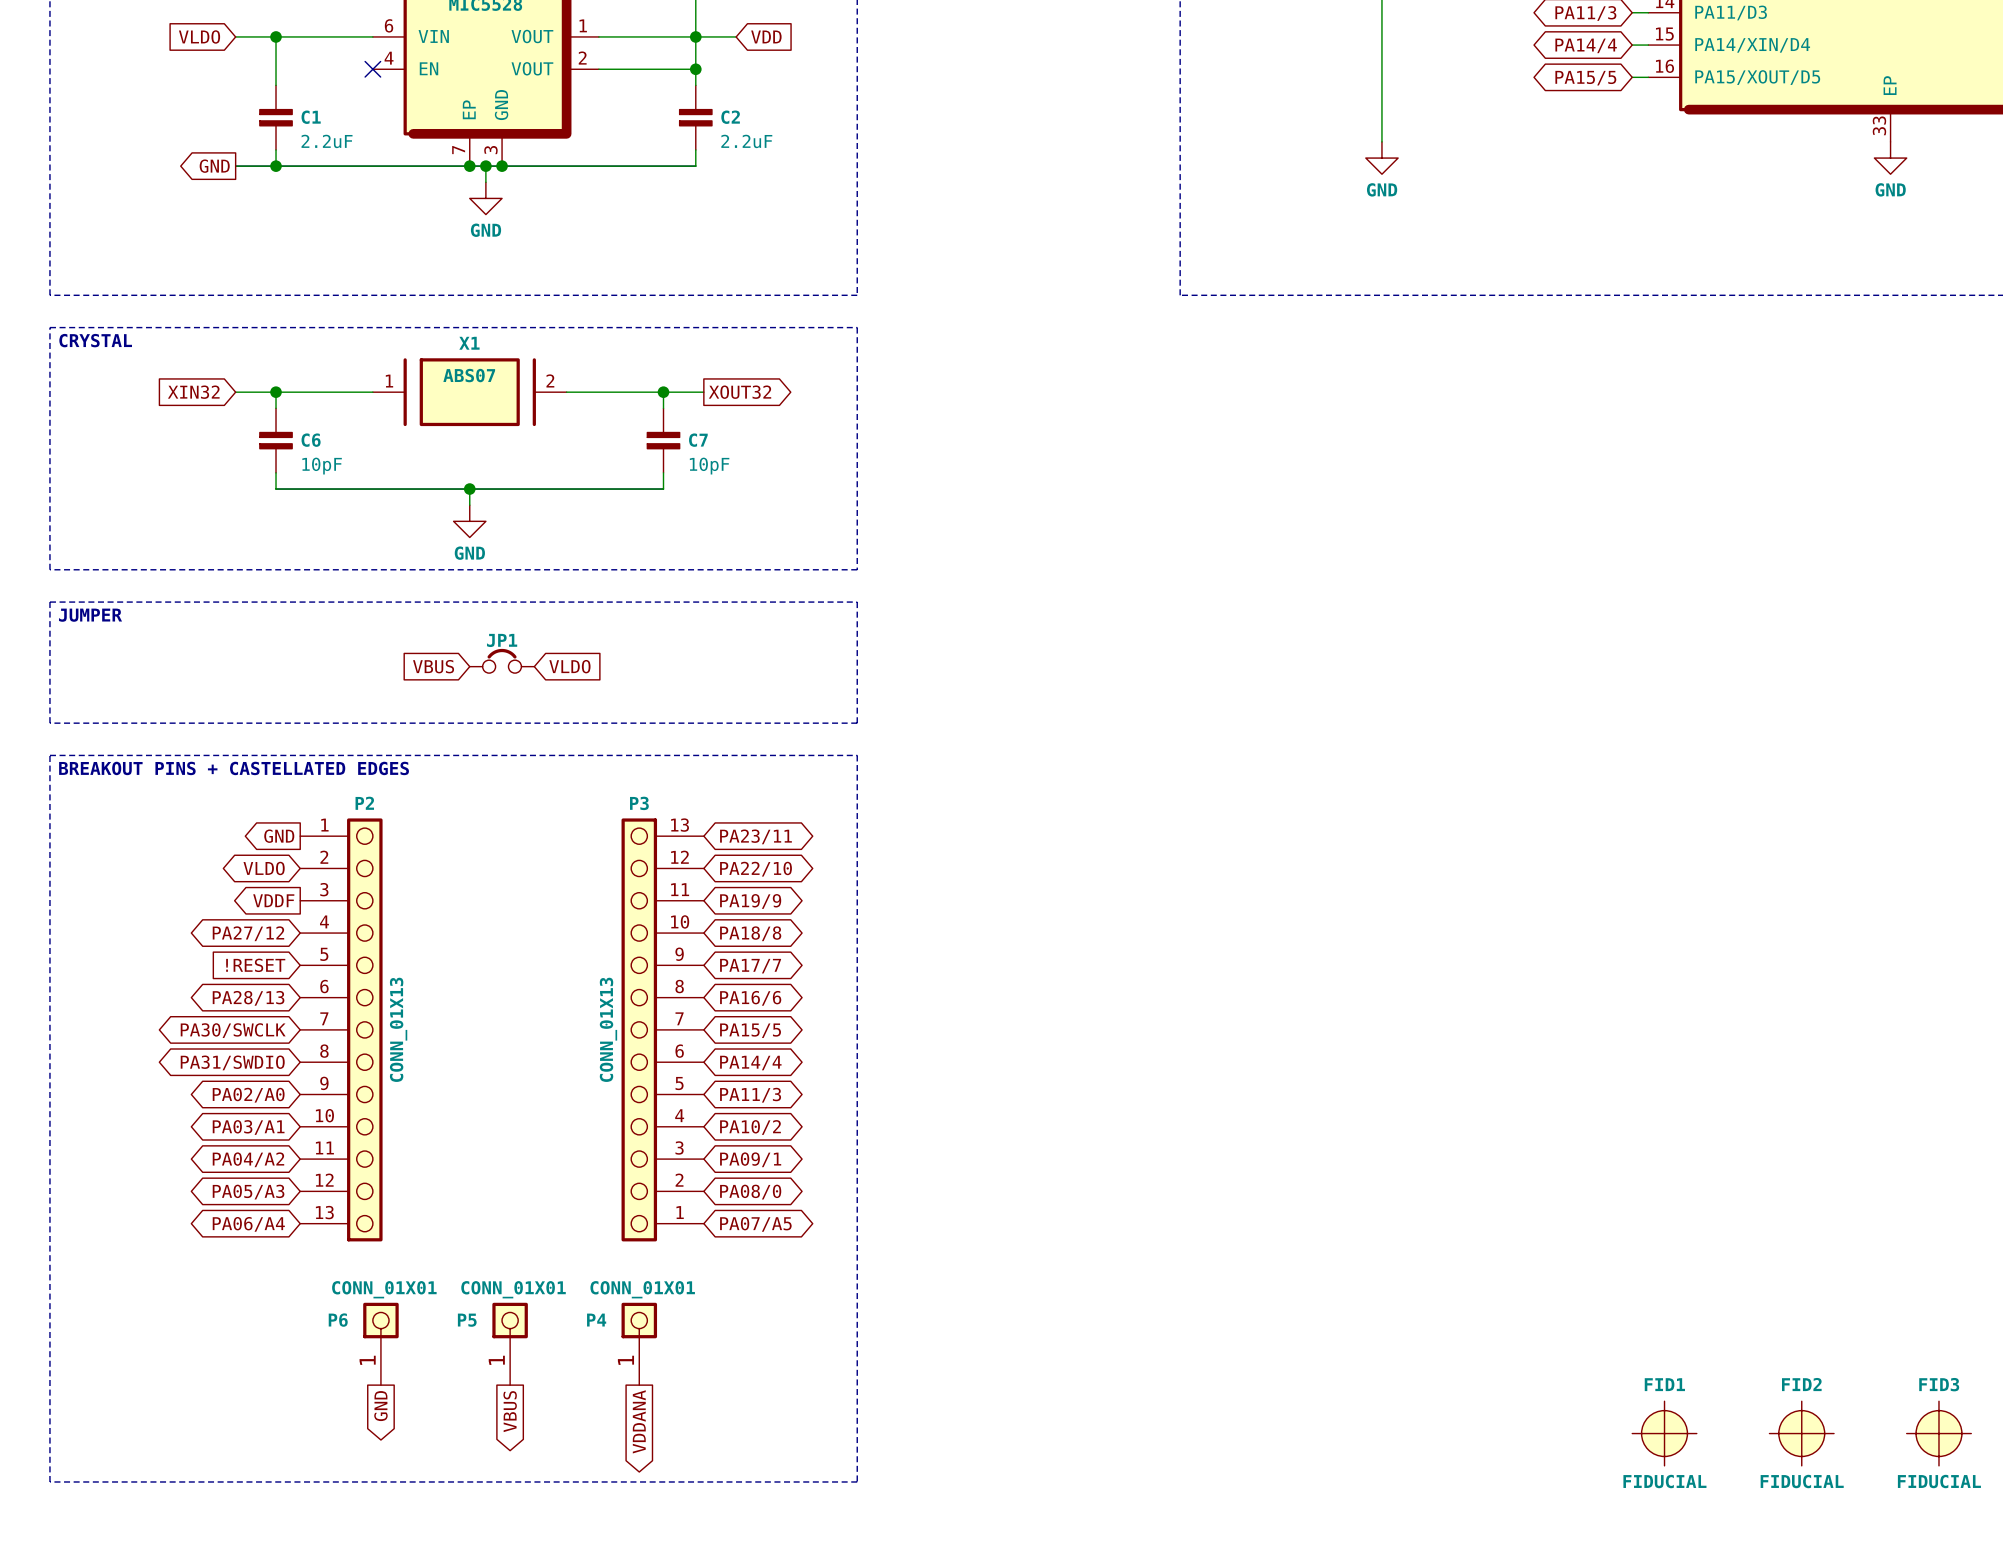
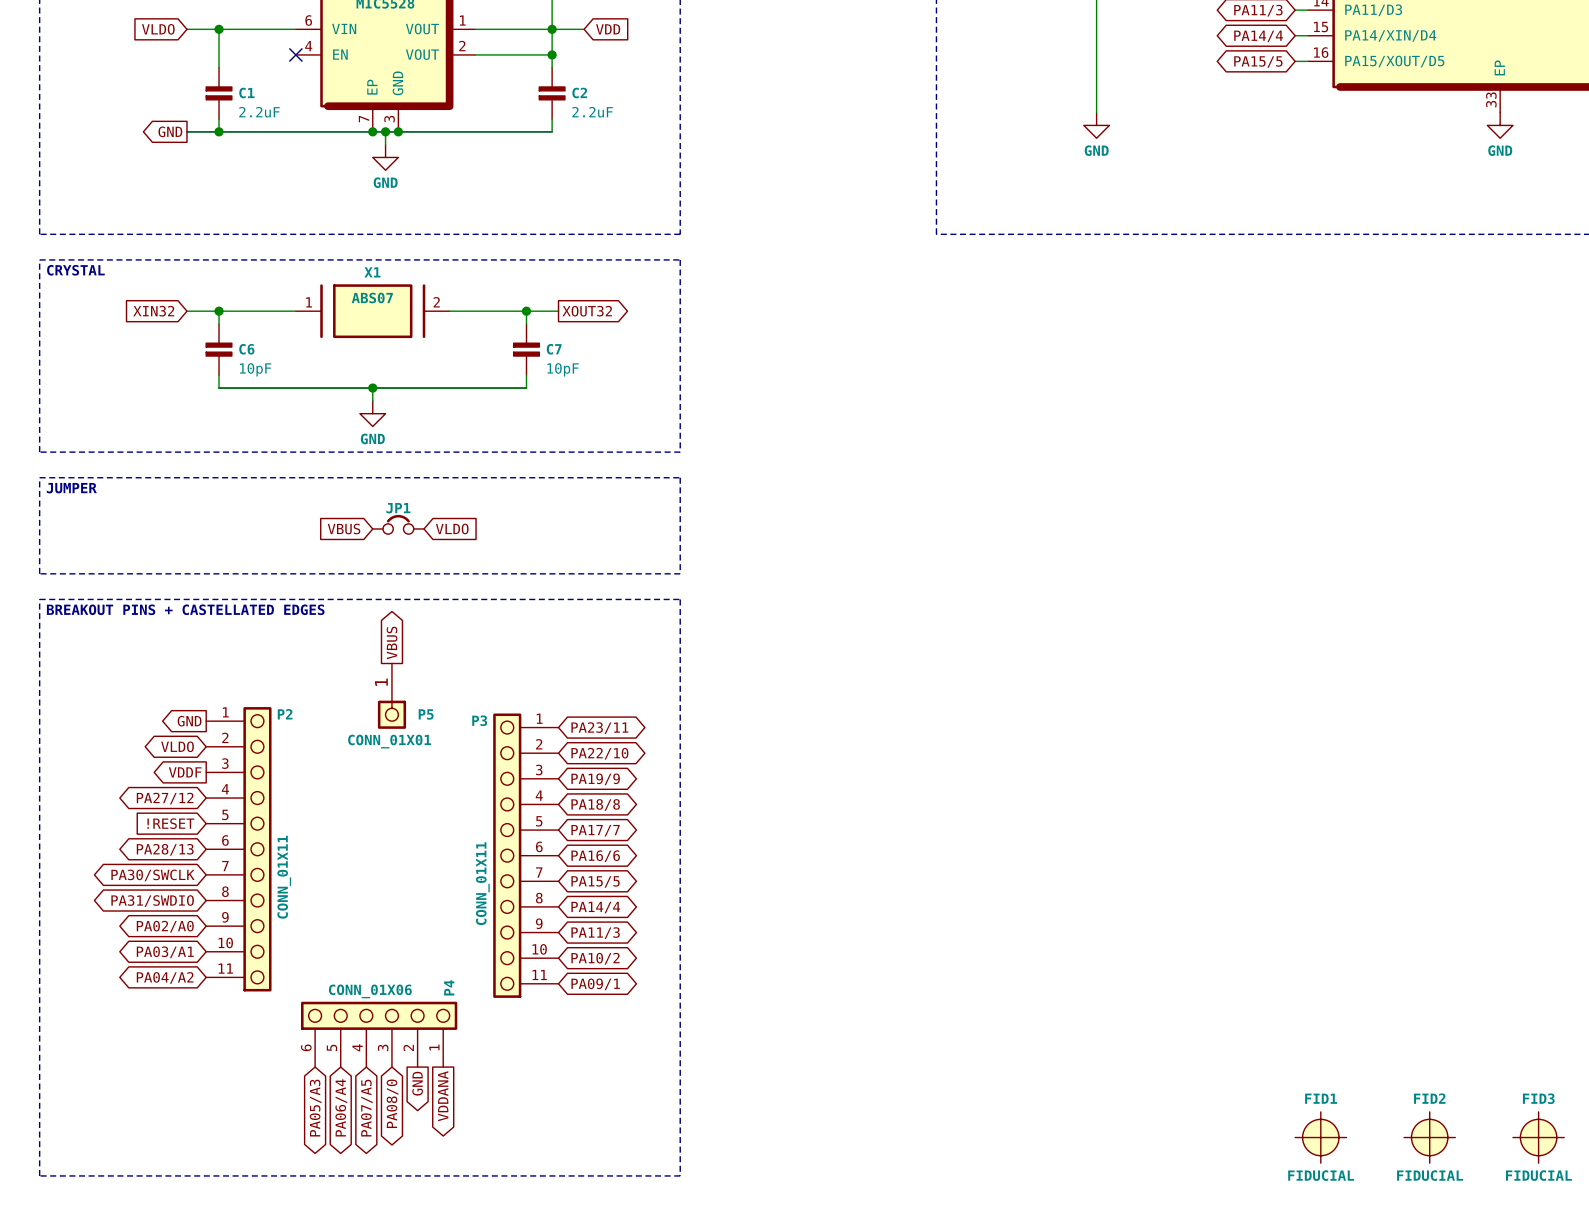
P2 name position: P2 (364, 803) -> P2 (285, 714)
P3 name position: P3 (639, 803) -> P3 (479, 720)
global label: none -> VBUS (391, 643)
P2 symbol: [300, 818, 383, 1242] -> [206, 707, 272, 992]
P3 symbol: [621, 818, 704, 1242] -> [493, 713, 559, 998]
global label position: GND (279, 836) -> GND (189, 721)
global label position: PA23/11 (755, 836) -> PA23/11 (599, 728)
global label position: VLDO (264, 868) -> VLDO (177, 746)
global label position: PA22/10 (756, 869) -> PA22/10 (599, 753)
global label position: VDDF (273, 900) -> VDDF (185, 772)
global label position: PA19/9 (750, 901) -> PA19/9 (595, 779)
global label position: PA27/12 (248, 933) -> PA27/12 (165, 798)
global label position: PA18/8 (750, 933) -> PA18/8 (595, 804)
global label position: !RESET (255, 965) -> !RESET (170, 823)
global label position: PA17/7 (750, 966) -> PA17/7 (595, 830)
global label position: PA28/13 (248, 998) -> PA28/13 (165, 849)
global label position: PA16/6 (750, 998) -> PA16/6 (595, 856)
P2 value: CONN_01X13 (398, 1029) -> CONN_01X11 (284, 877)
P3 value: CONN_01X13 (608, 1029) -> CONN_01X11 (482, 883)
global label position: PA30/SWCLK (233, 1030) -> PA30/SWCLK (153, 875)
global label position: PA15/5 (750, 1030) -> PA15/5 (595, 881)
global label position: PA31/SWDIO (232, 1062) -> PA31/SWDIO (152, 901)
global label position: PA14/4 (750, 1063) -> PA14/4 (595, 907)
global label position: PA02/A0 (248, 1095) -> PA02/A0 (165, 926)
global label position: PA11/3 (750, 1095) -> PA11/3 (595, 933)
global label position: PA03/A1 (248, 1127) -> PA03/A1 (165, 952)
global label position: PA10/2 (750, 1127) -> PA10/2 (595, 958)
global label position: PA04/A2 (248, 1159) -> PA04/A2 (165, 977)
global label position: PA09/1 (750, 1159) -> PA09/1 (595, 984)
global label rotation: 0° (248, 1192) -> 90° counterclockwise (315, 1108)
global label position: PA05/A3 (248, 1192) -> PA05/A3 (315, 1108)
global label rotation: 0° (750, 1192) -> 90° clockwise (392, 1103)
global label position: PA08/0 (750, 1192) -> PA08/0 (392, 1103)
global label rotation: 0° (248, 1224) -> 90° counterclockwise (341, 1107)
global label position: PA06/A4 (248, 1224) -> PA06/A4 (341, 1107)
global label rotation: 0° (755, 1224) -> 90° clockwise (366, 1108)
global label position: PA07/A5 (755, 1224) -> PA07/A5 (366, 1108)
P4 value: CONN_01X01 (642, 1289) -> CONN_01X06 (370, 991)
P4 symbol: [621, 1302, 658, 1386] -> [301, 1001, 458, 1068]
P5 rotation: 0° (510, 1320) -> 180° (391, 714)
P4 name position: P4 (596, 1320) -> P4 (449, 987)
P6: CONN_01X01 (380, 1343) -> none
P5 position: (510, 1343) -> (391, 696)
global label position: GND (380, 1406) -> GND (417, 1083)
global label: VBUS (510, 1411) -> none
global label position: VDDANA (639, 1421) -> VDDANA (443, 1096)

